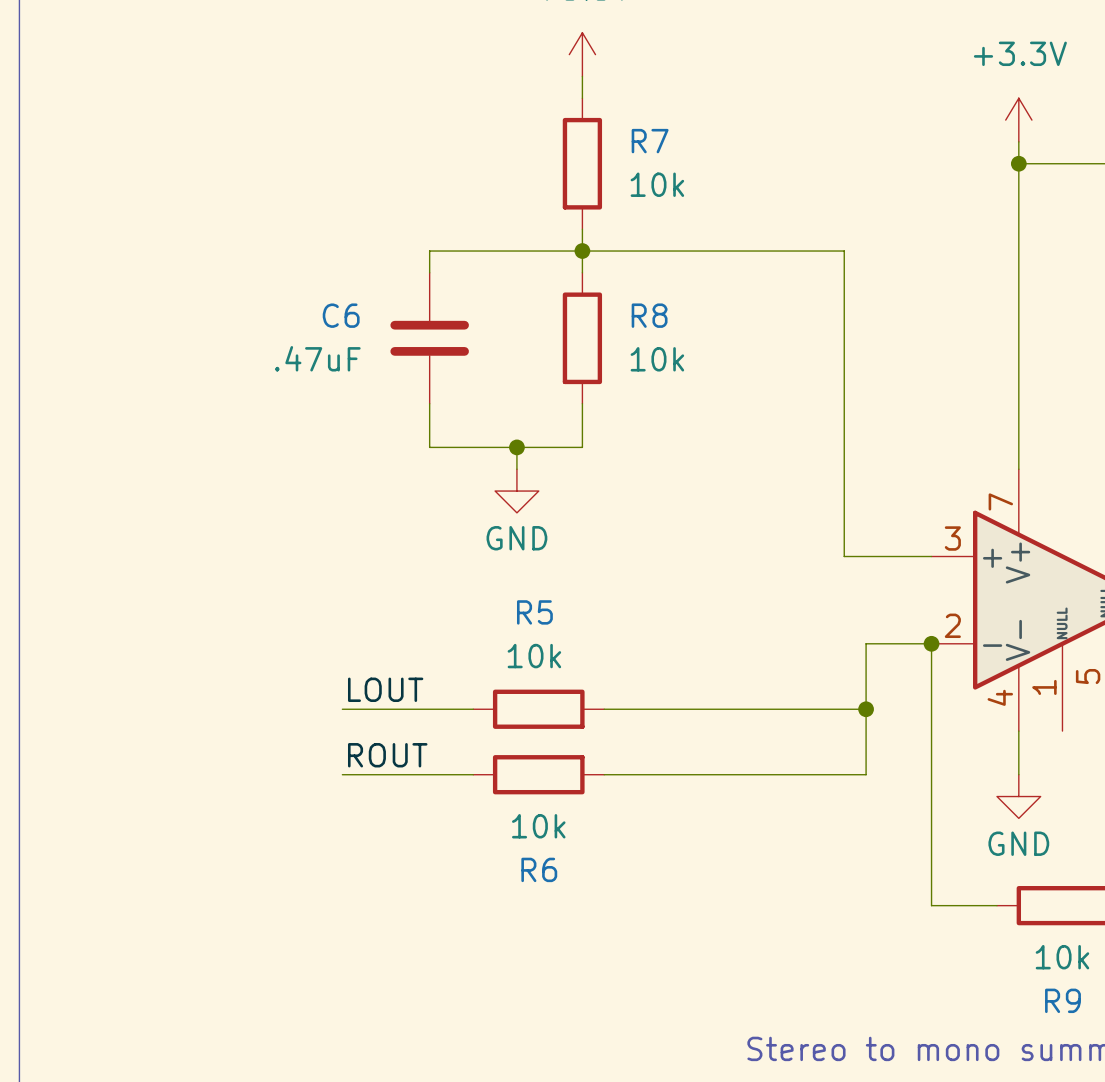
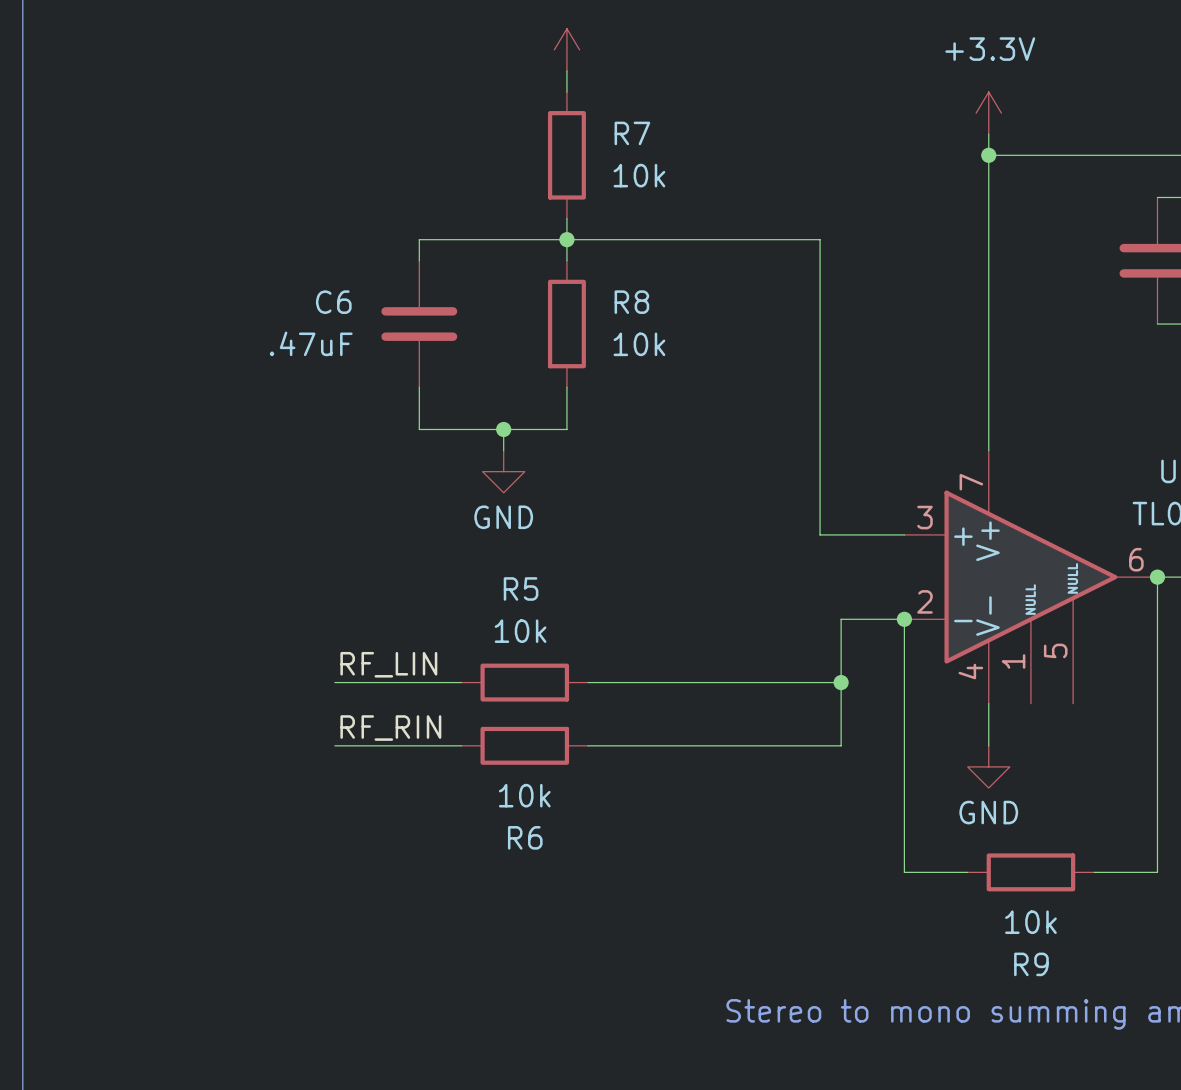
label: LOUT (385, 689) -> RF_LIN (388, 664)
label: ROUT (387, 755) -> RF_RIN (390, 728)

